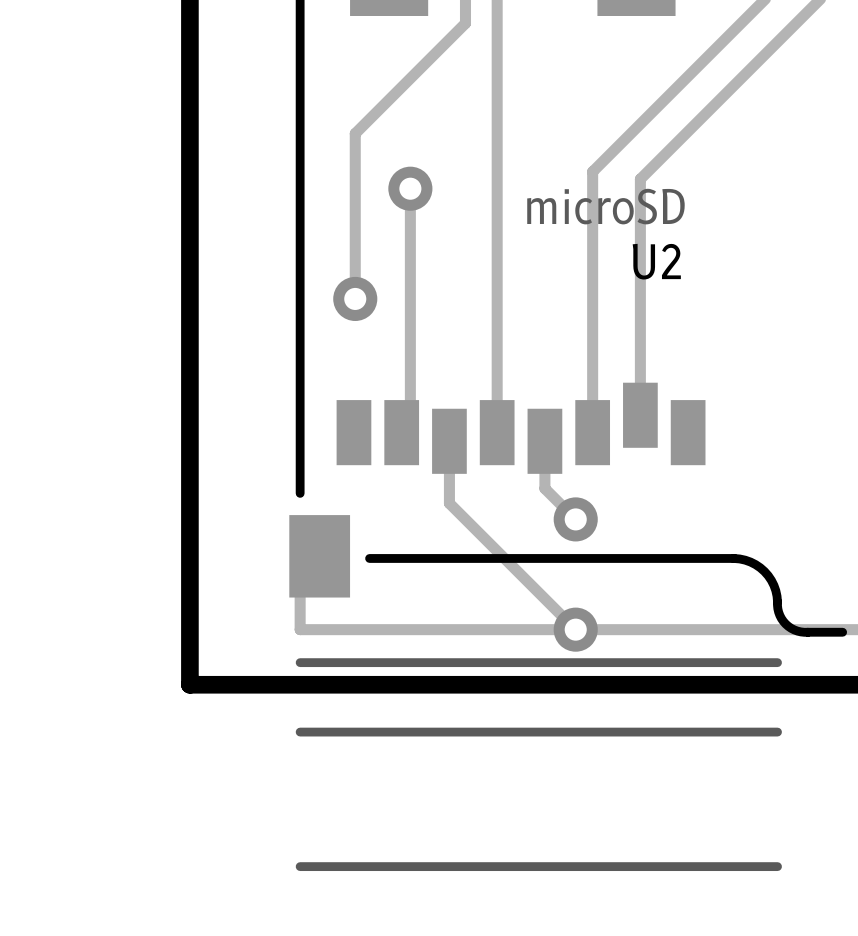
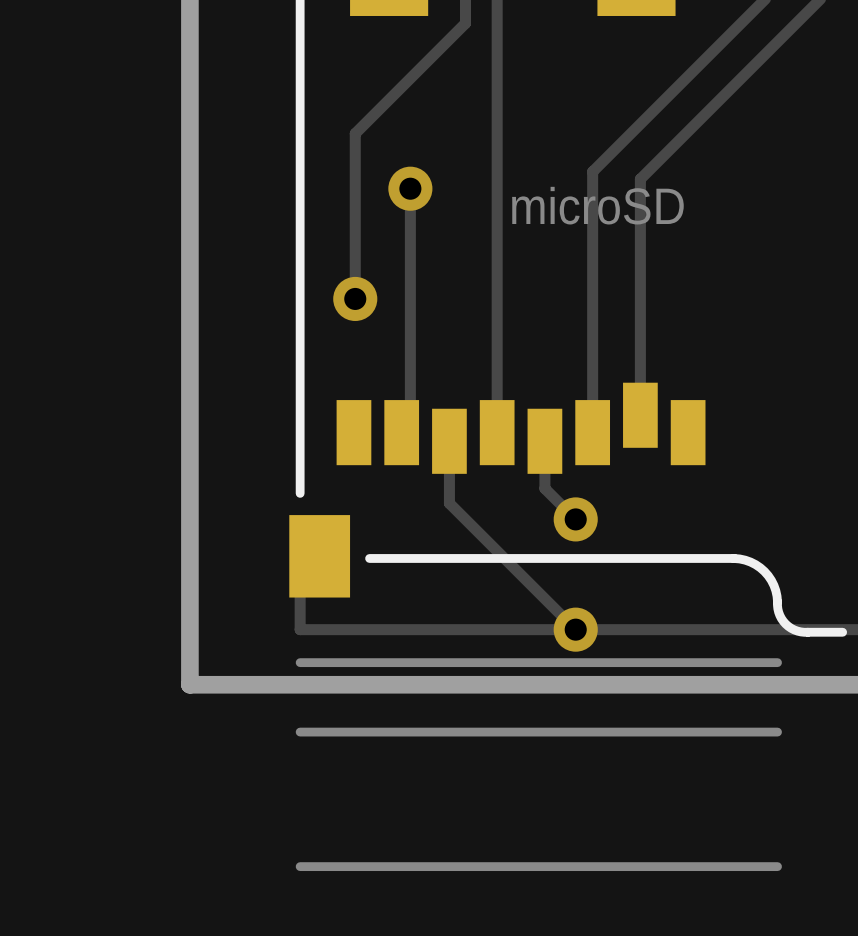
U2 name: U2 (656, 261) -> none

